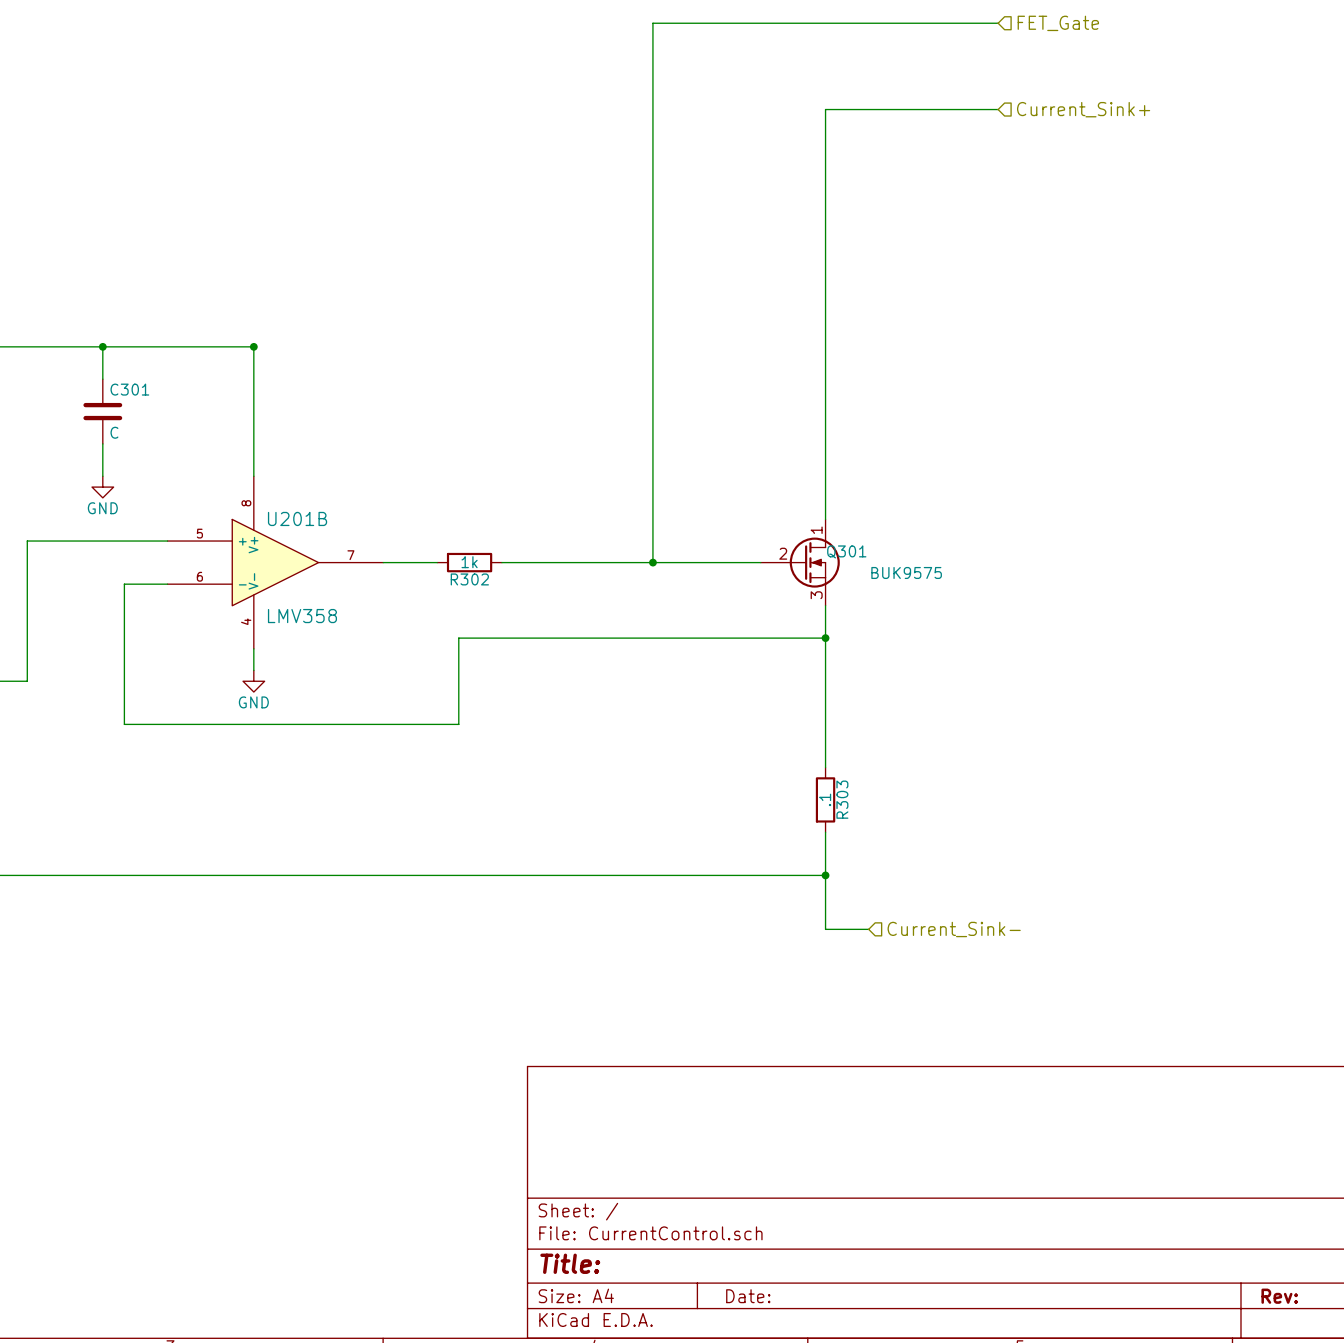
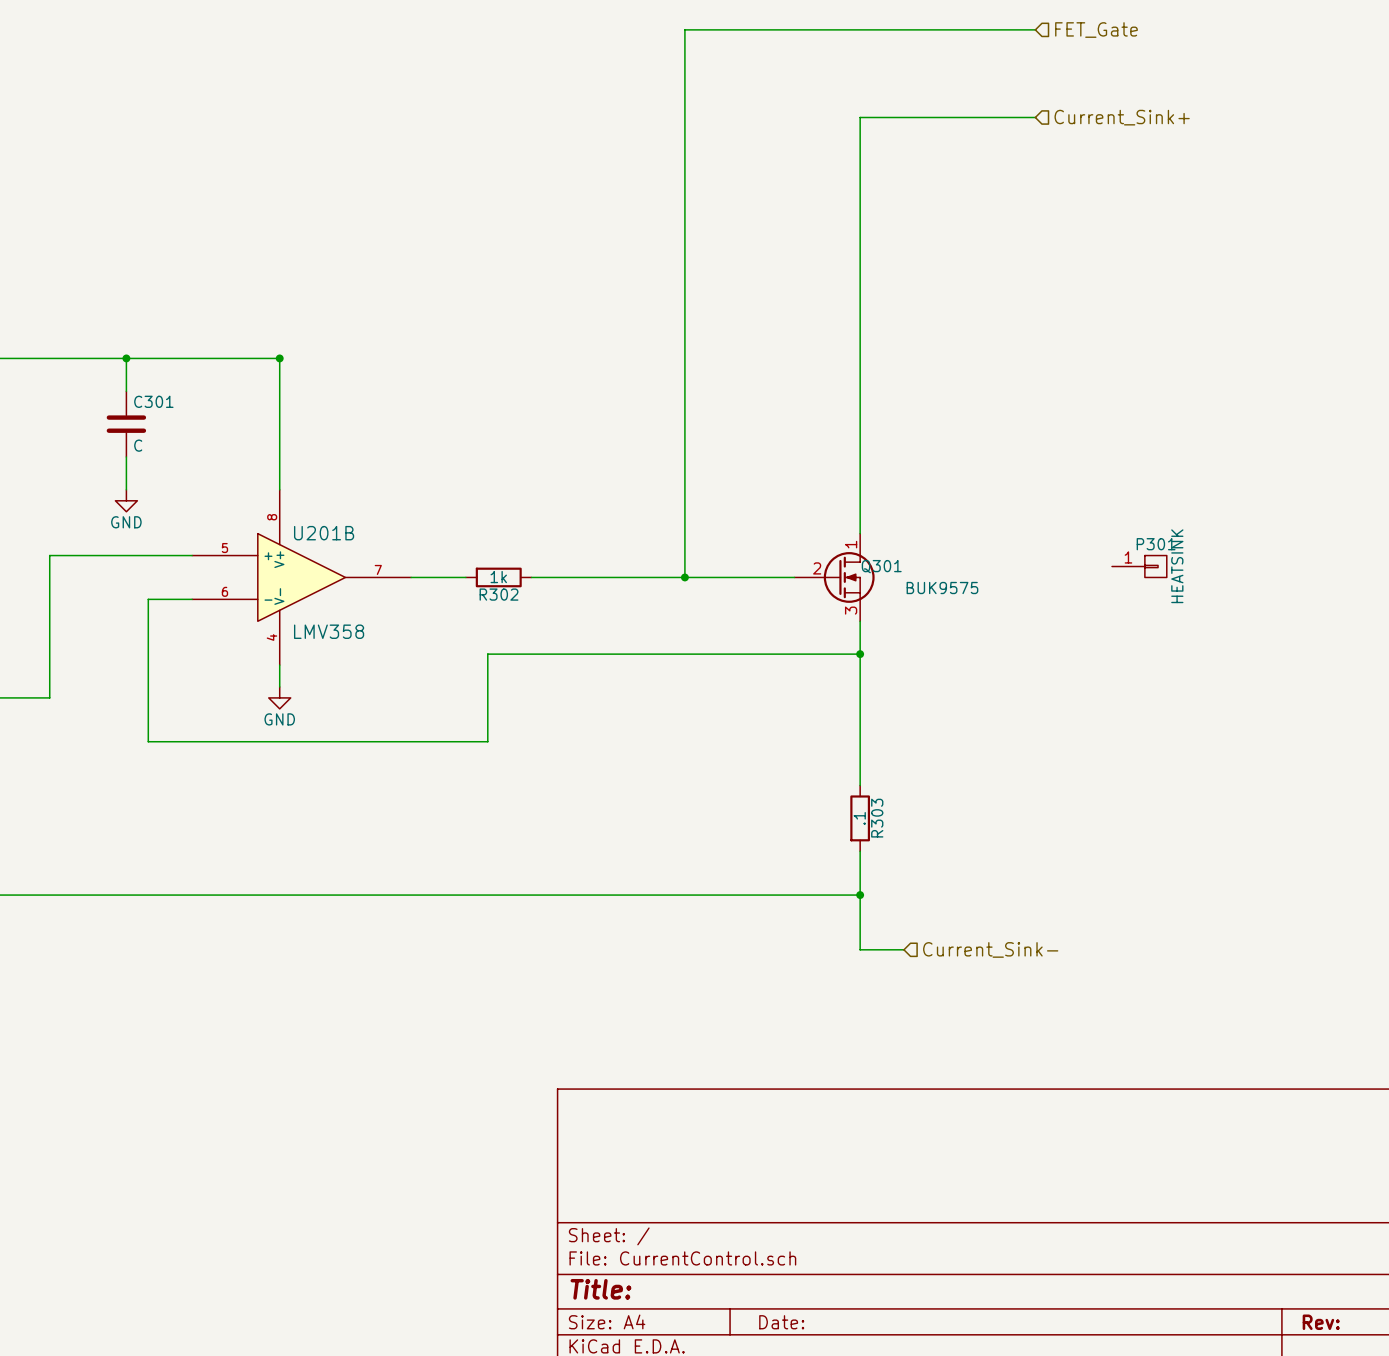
P301: none -> HEATSINK (1139, 566)

